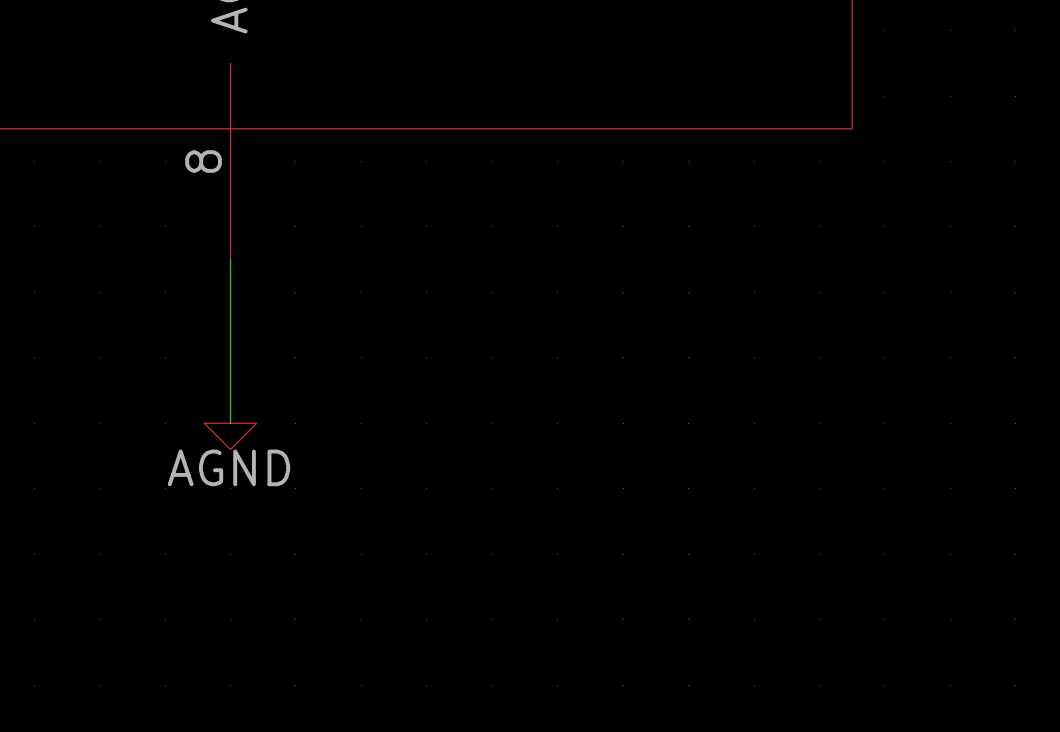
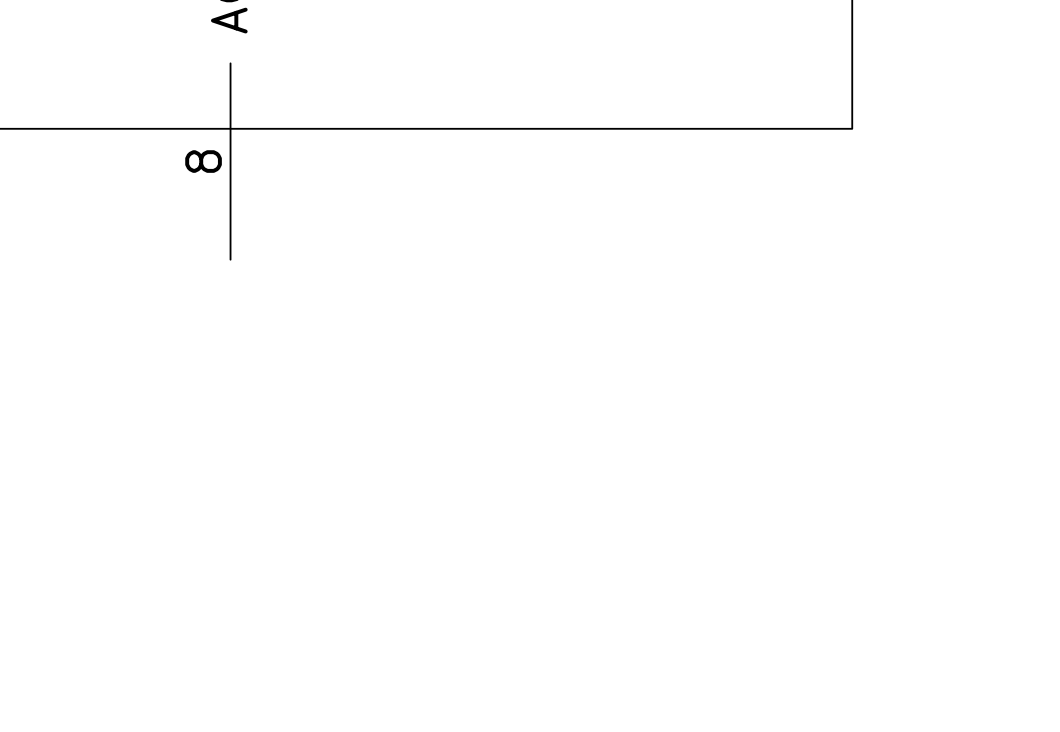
wire: (230, 259) (230, 423) -> none
power symbol: AGND (230, 436) -> none

